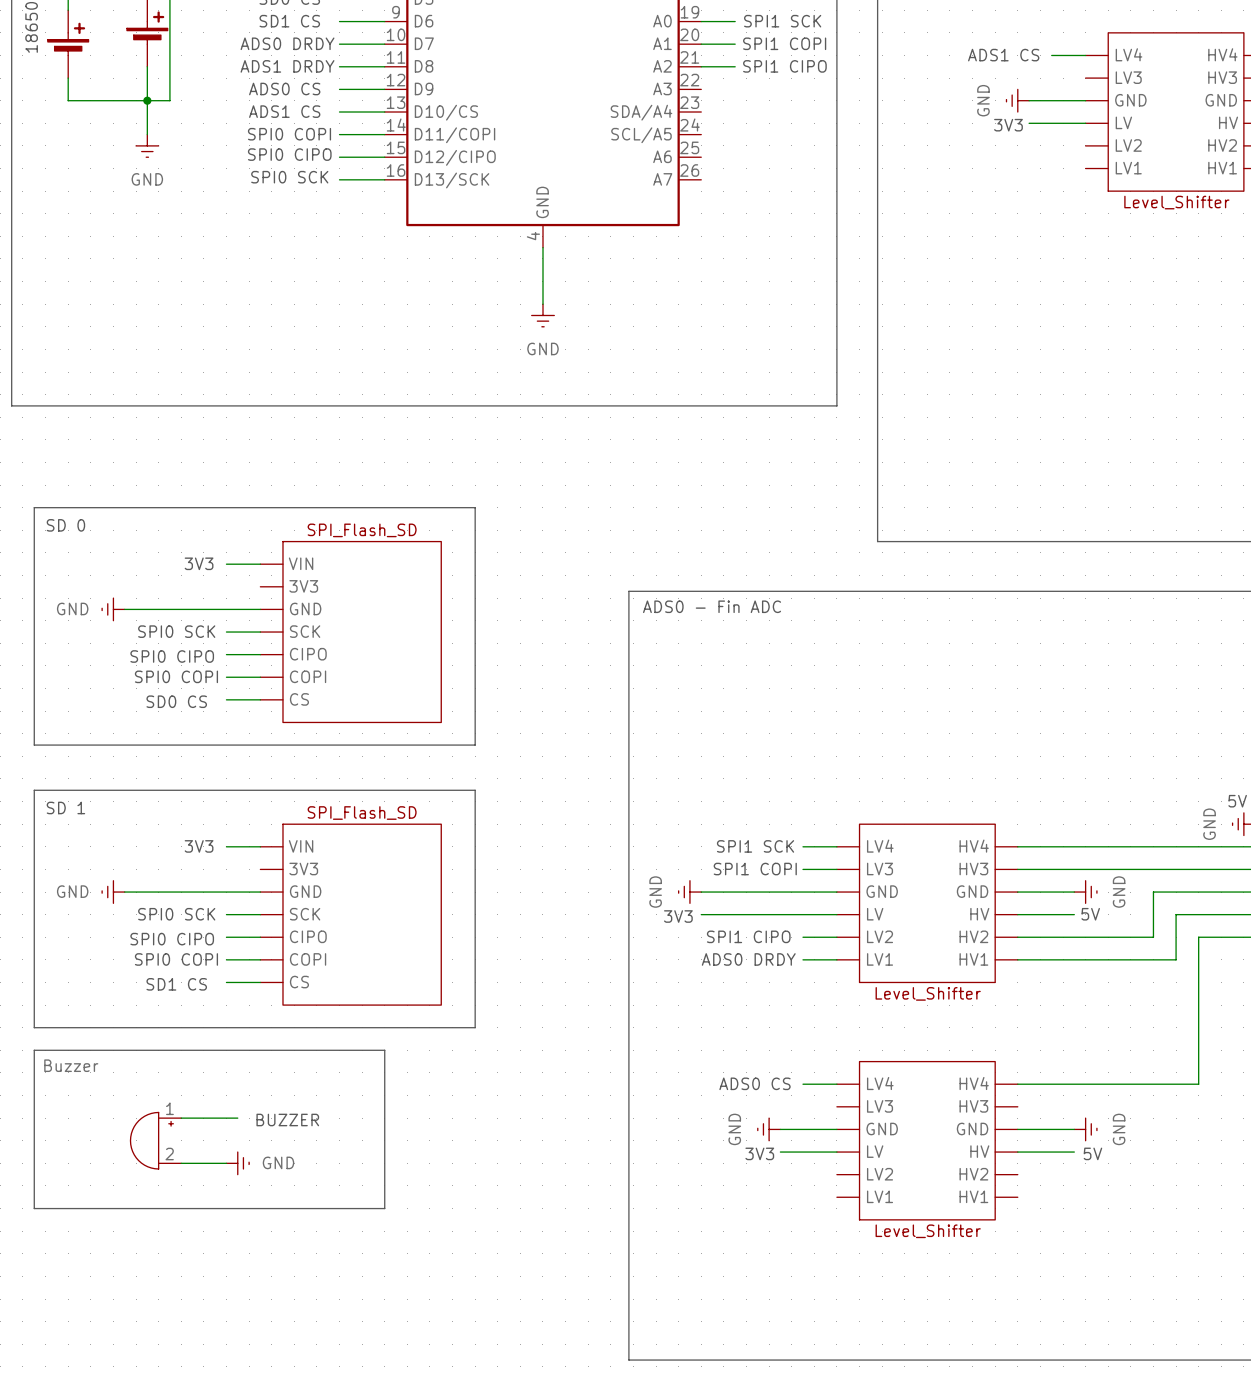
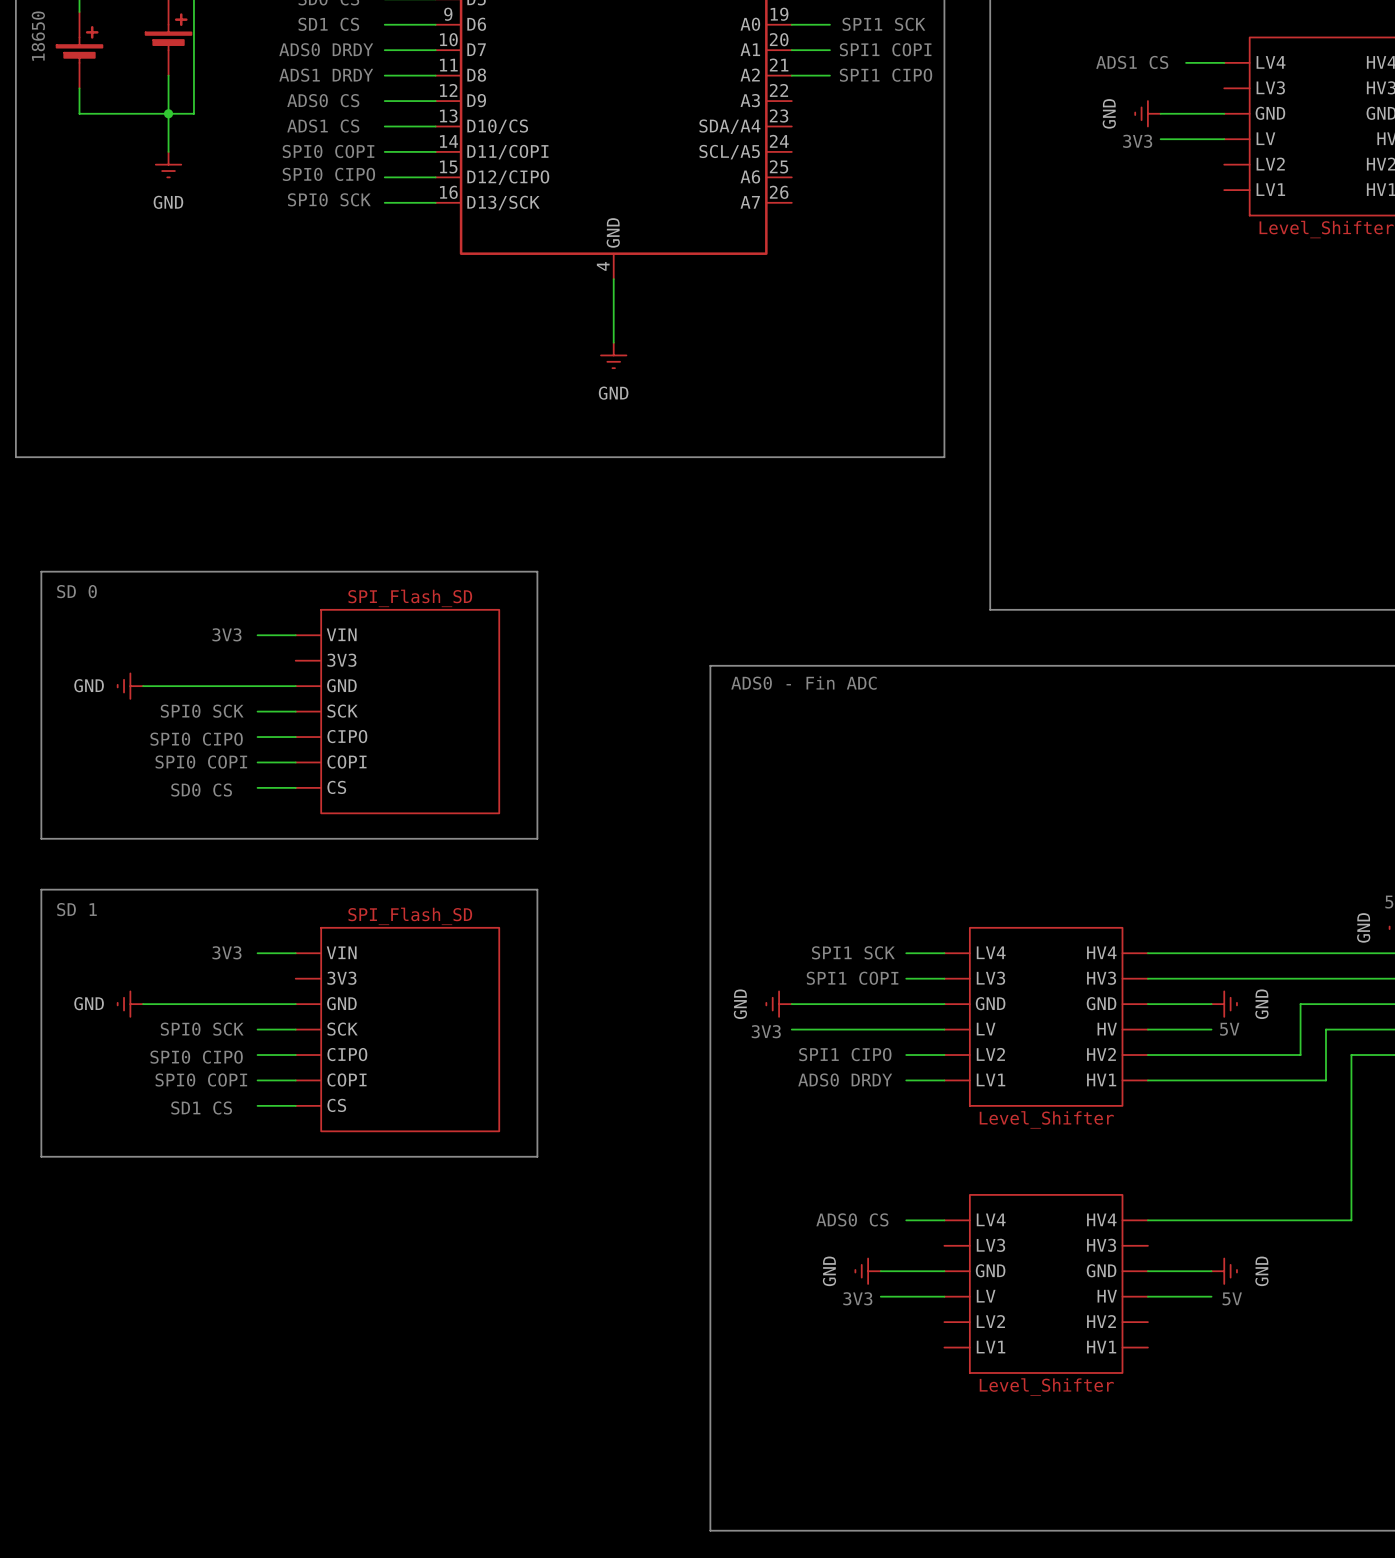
line: (34, 1050) (384, 1050) (384, 1208) (34, 1208) (34, 1050) -> none
wire: (181, 1118) (237, 1118) -> none
text: BUZZER (287, 1119) -> none
part: Buzzer (155, 1140) -> none
wire: (181, 1163) (226, 1163) -> none
power symbol: GND (237, 1163) -> none

